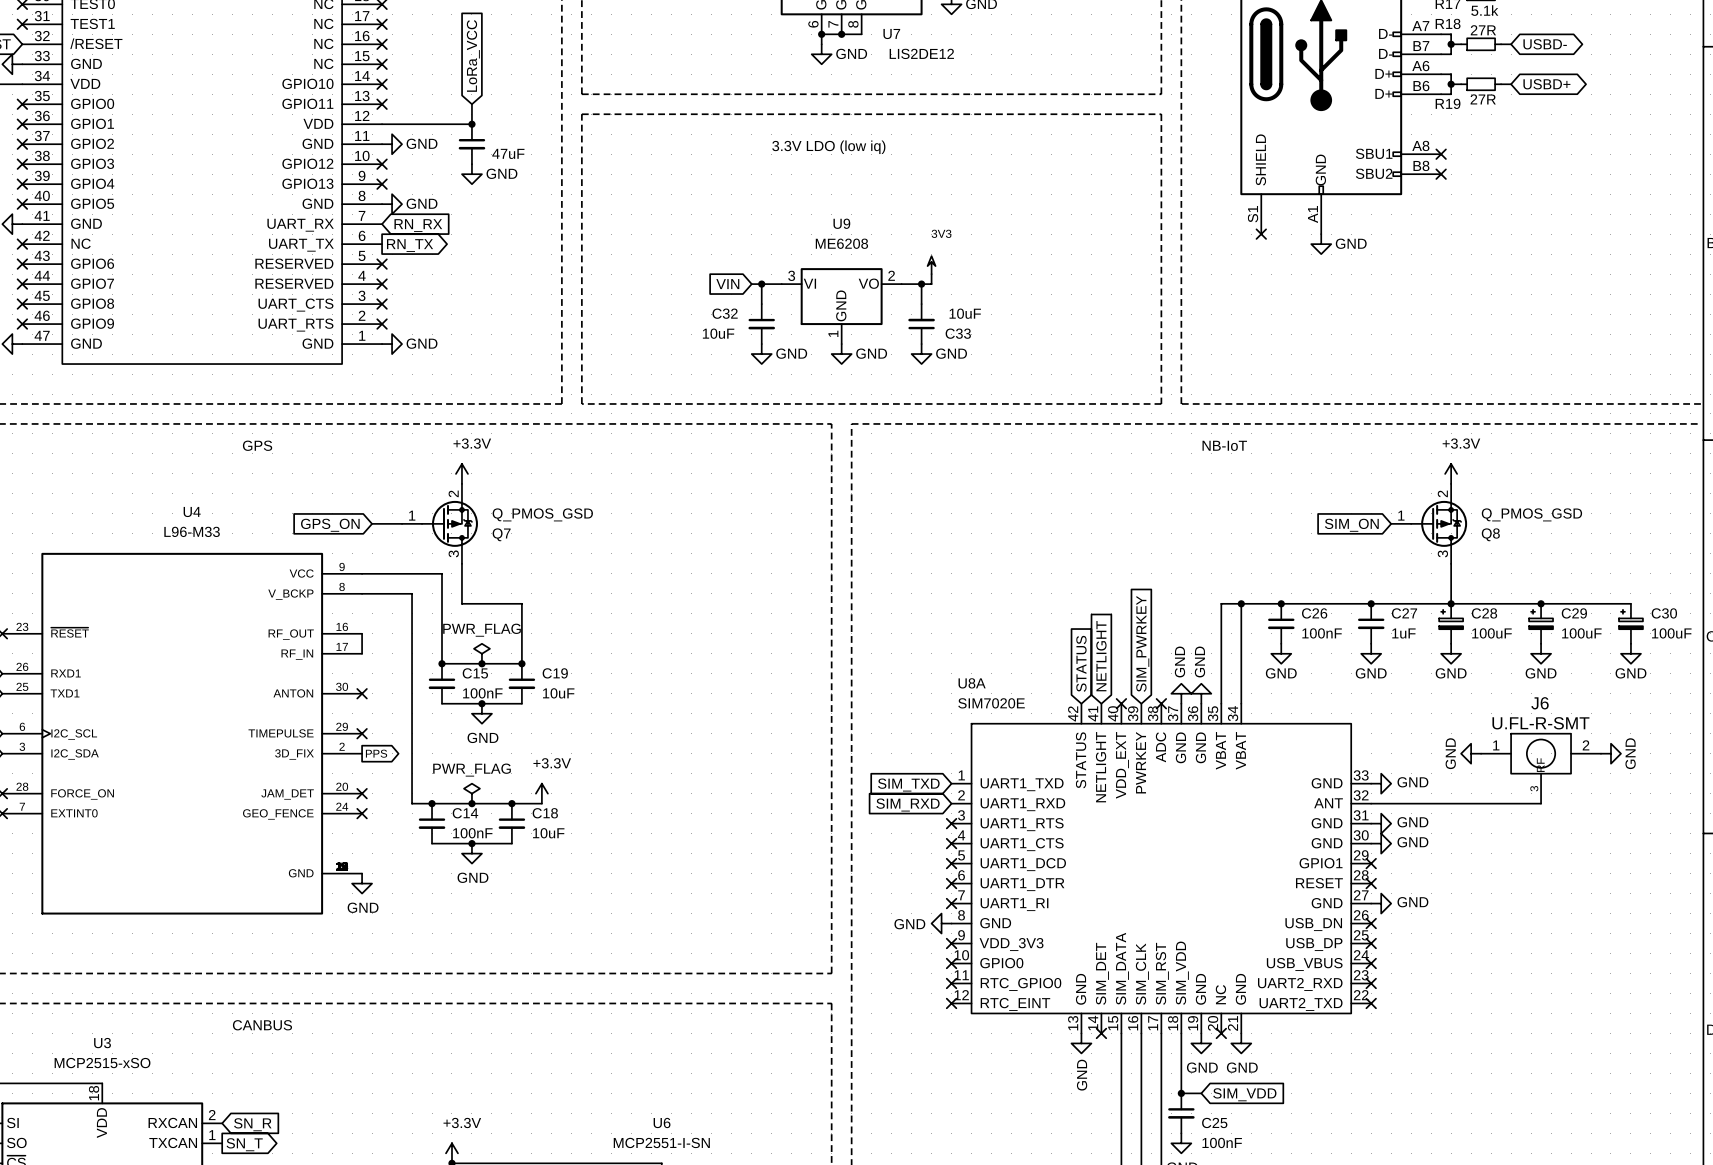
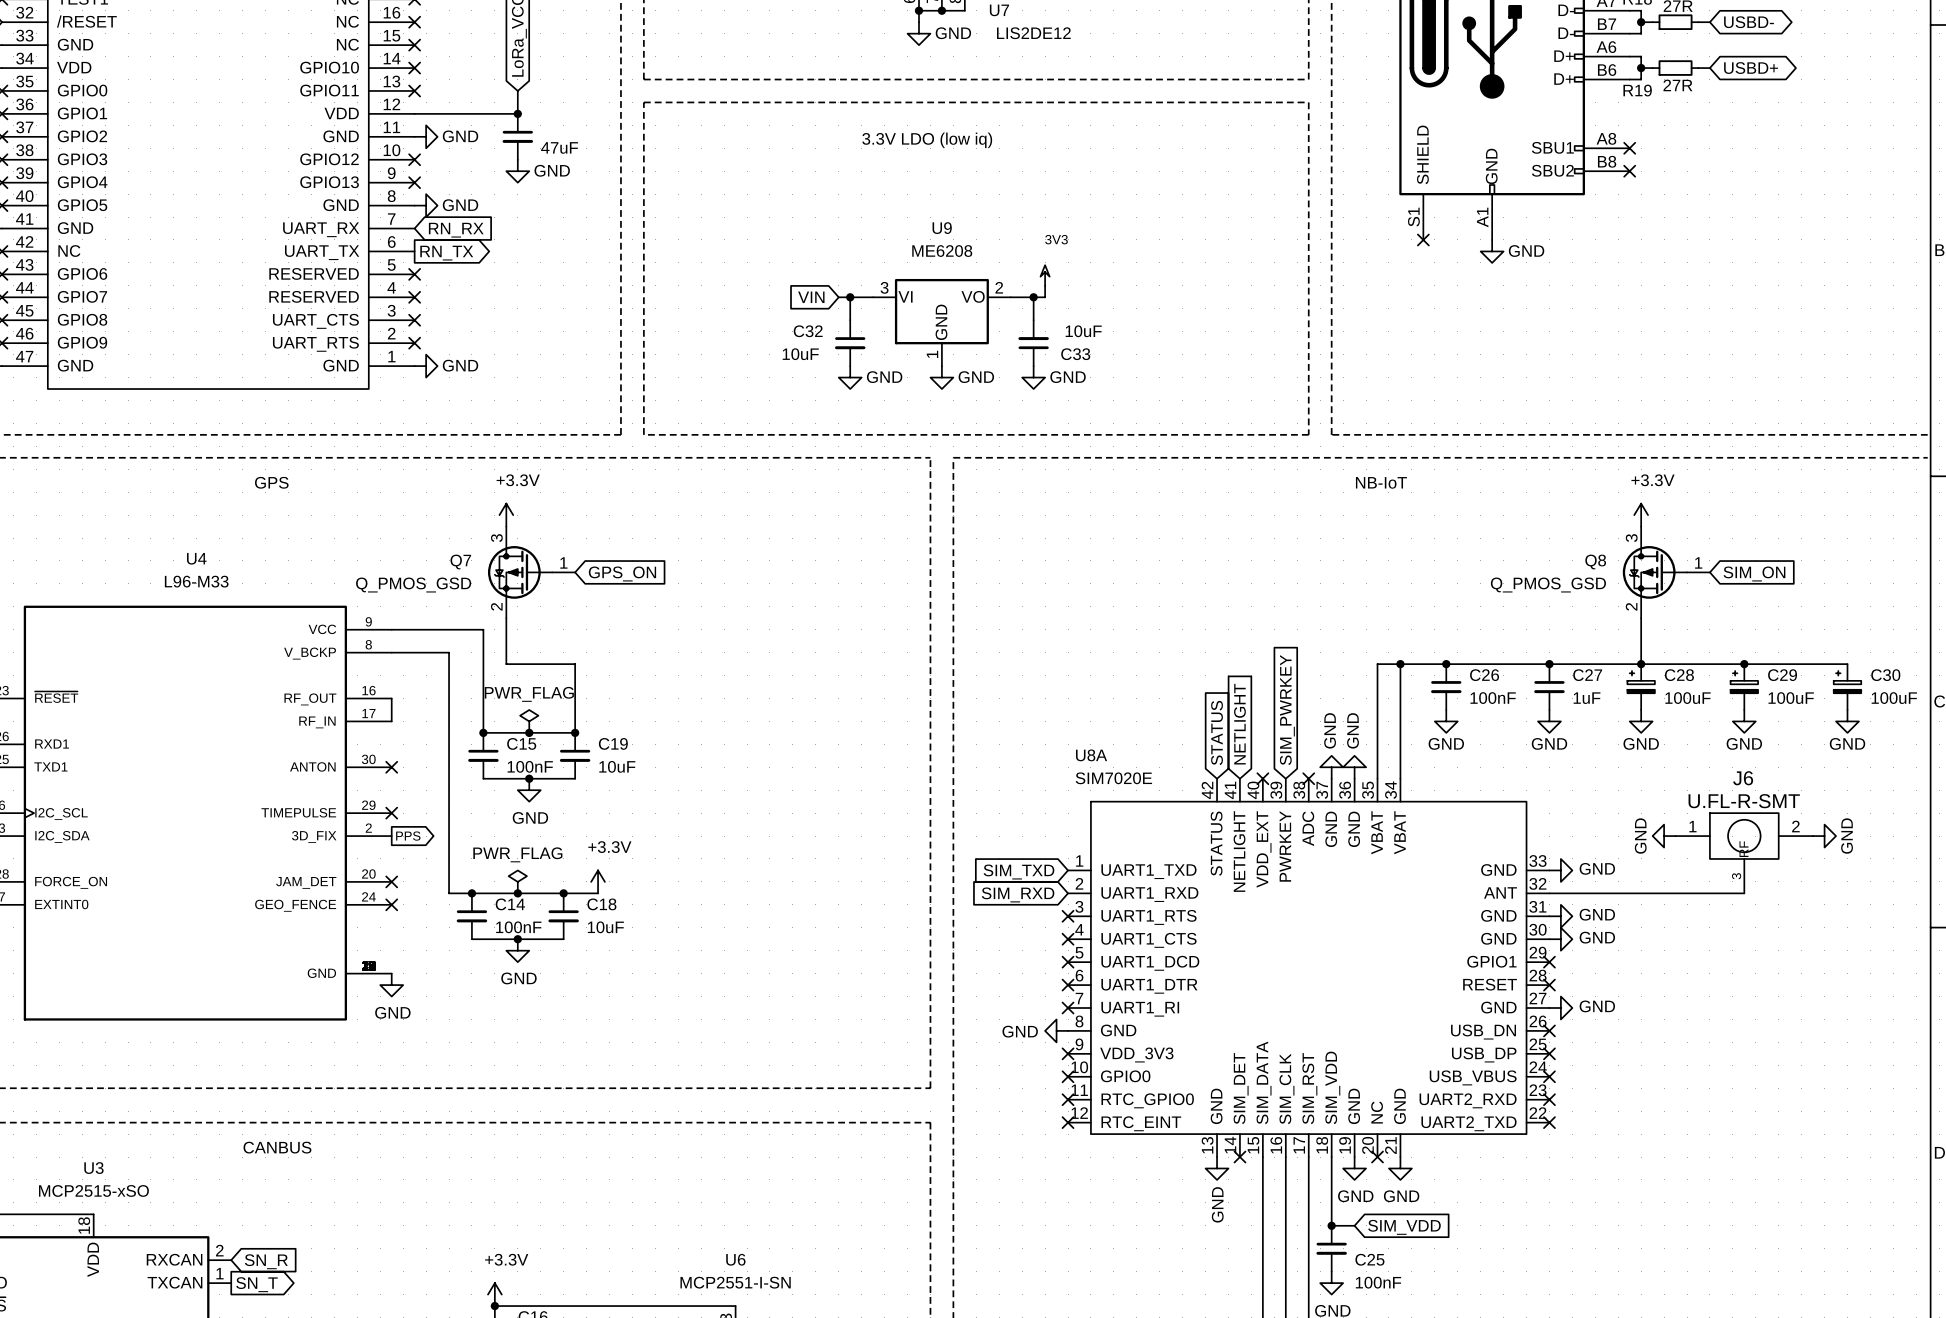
wire: (372, 523) (402, 523) -> none
Q7 rotation: 0° (449, 523) -> 180° (520, 572)
Q8 rotation: 0° (1439, 523) -> 180° (1654, 572)
global label rotation: 0° (330, 525) -> 180° (622, 573)
global label position: GPS_ON (330, 525) -> GPS_ON (622, 573)
global label rotation: 0° (1351, 525) -> 180° (1754, 573)
global label position: SIM_ON (1351, 525) -> SIM_ON (1754, 573)

